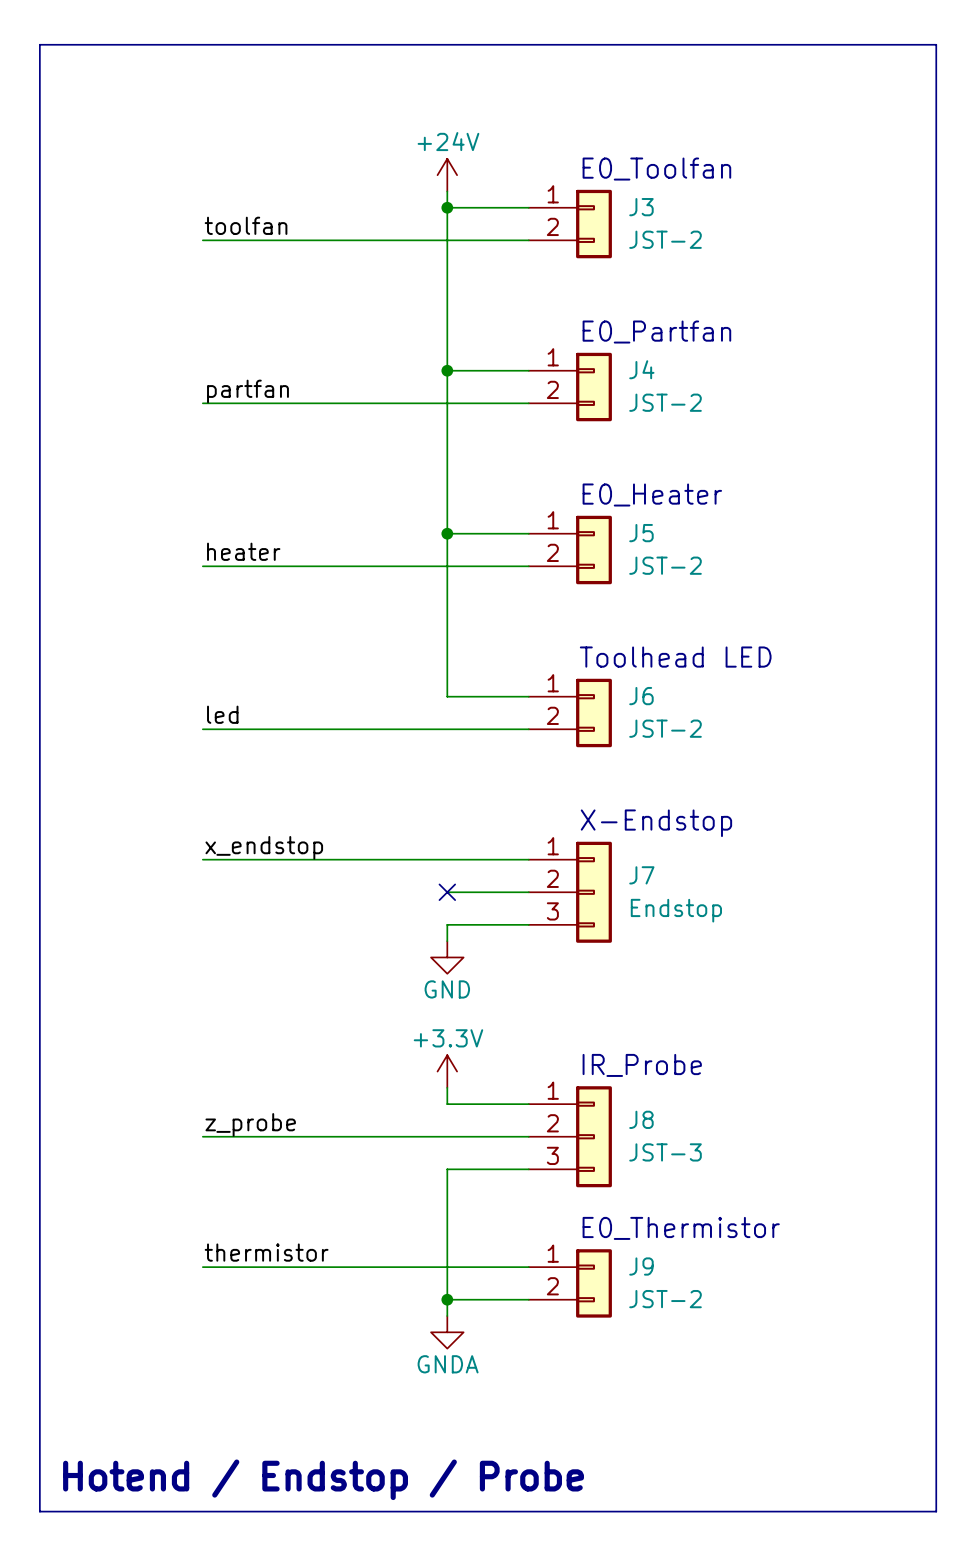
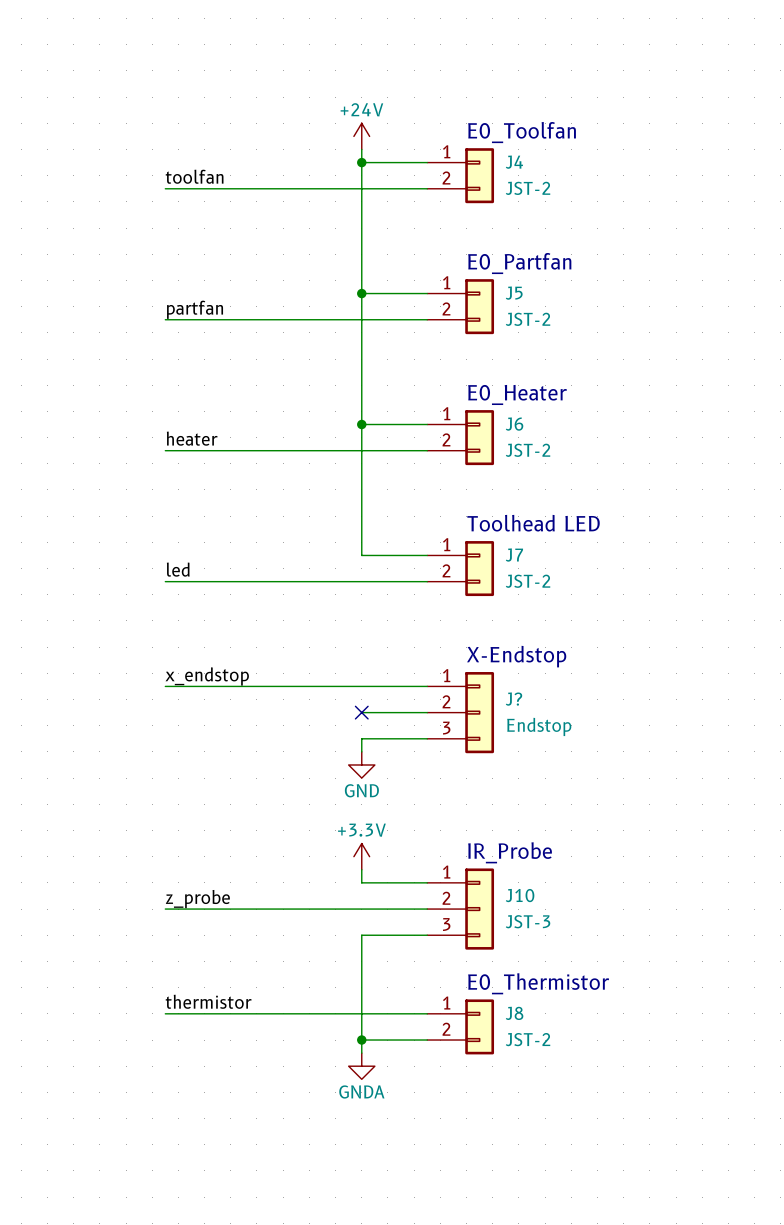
line: (39, 44) (39, 1511) (936, 1511) (936, 44) (39, 44) -> none
J3 name: J3 (641, 207) -> J4 (514, 162)
J4 name: J4 (641, 369) -> J5 (514, 293)
J5 name: J5 (641, 533) -> J6 (514, 424)
J6 name: J6 (641, 696) -> J7 (514, 555)
J7 name: J7 (641, 875) -> J? (514, 699)
J8 name: J8 (641, 1119) -> J10 (520, 895)
J9 name: J9 (641, 1266) -> J8 (514, 1013)
text: Hotend / Endstop / Probe (323, 1479) -> none

